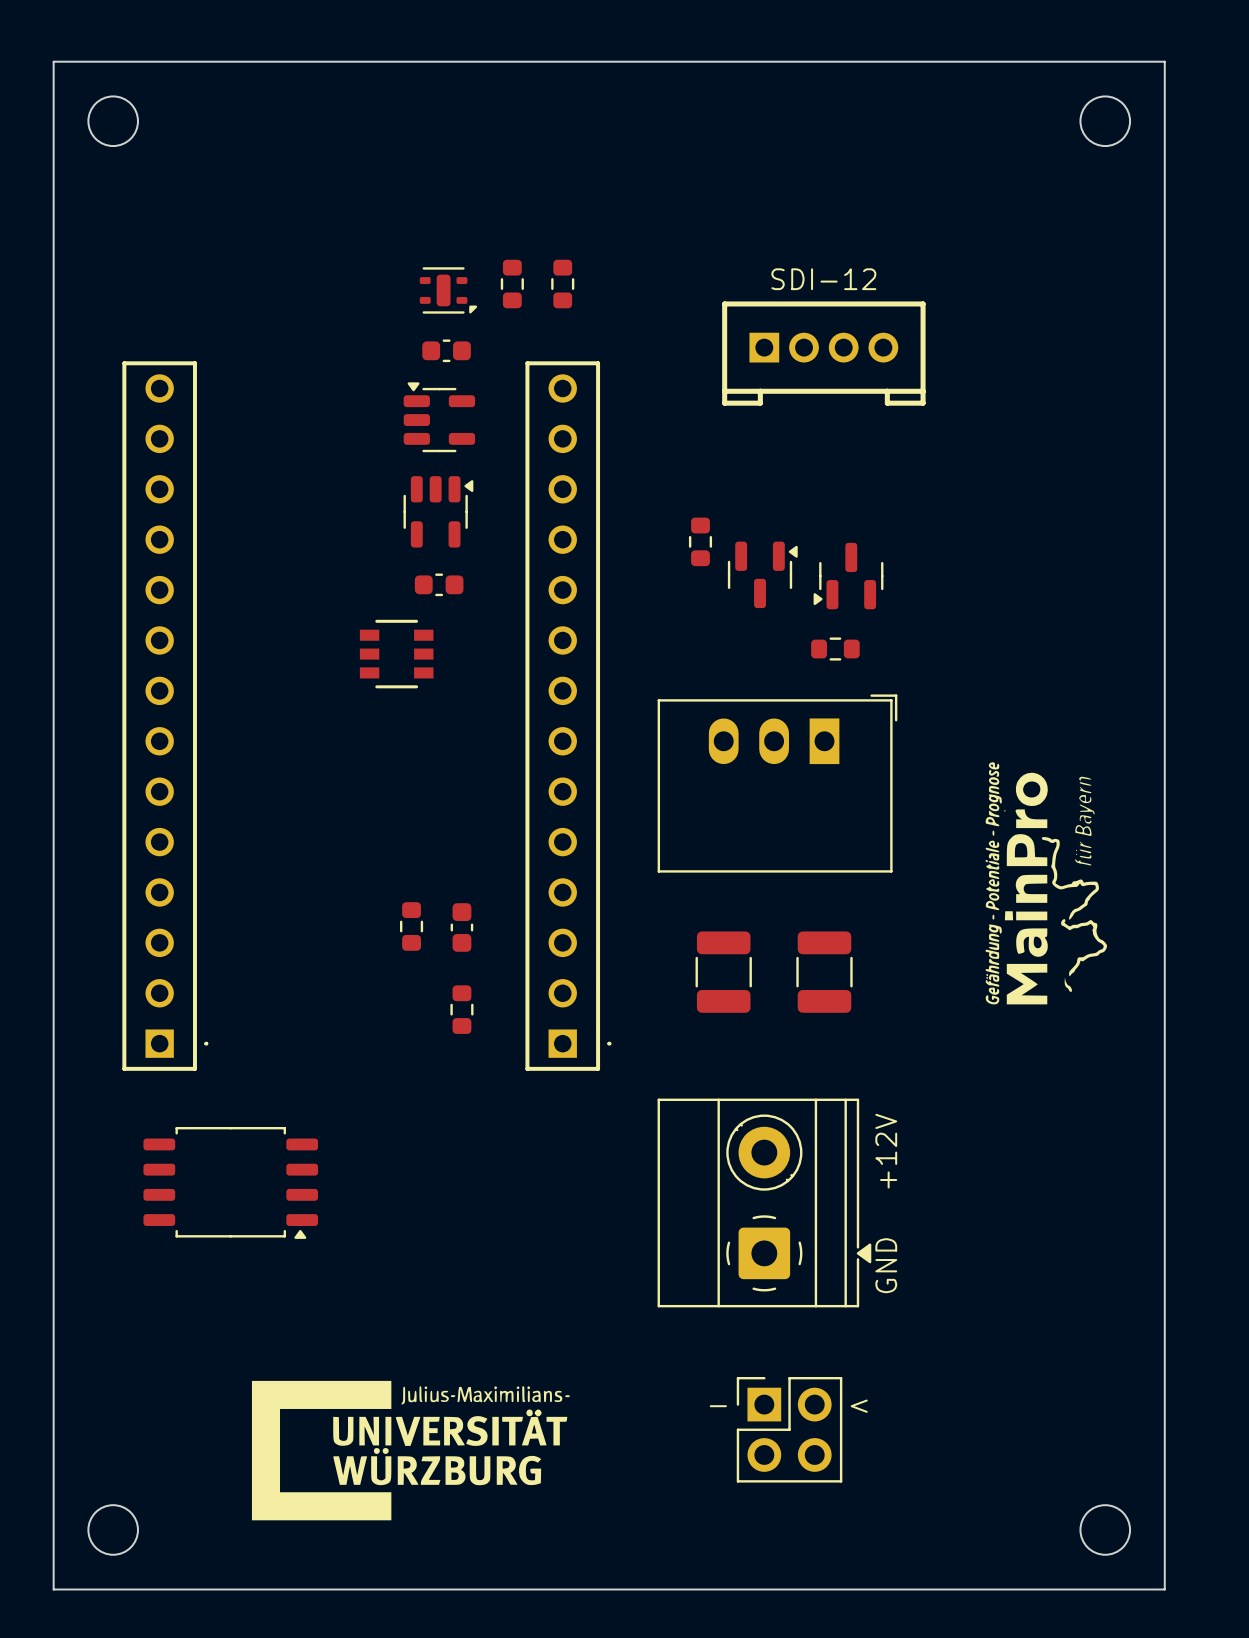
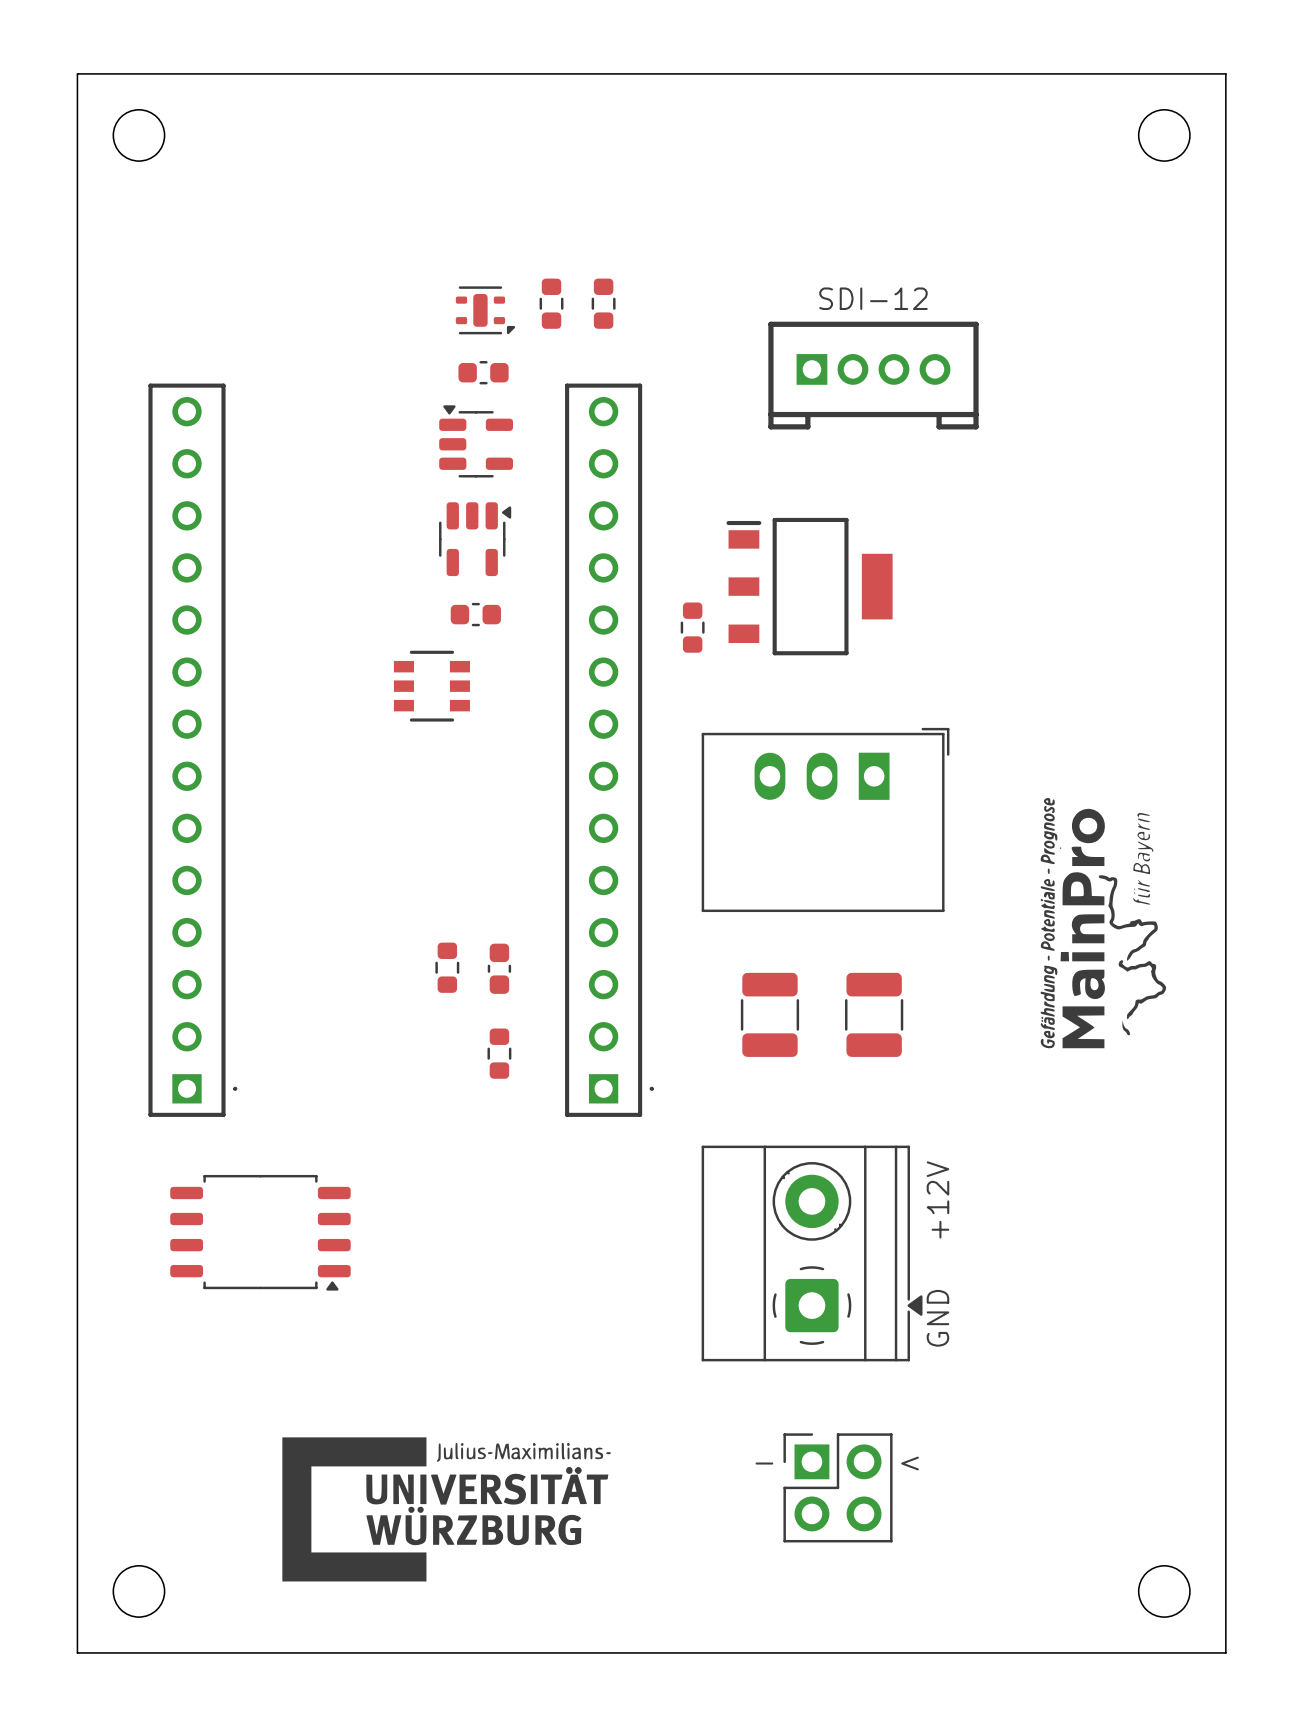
part position: (700, 541) -> (692, 627)
part footprint: [727, 541, 798, 609] -> [726, 517, 893, 656]
part: (848, 576) -> none
part: (835, 649) -> none

